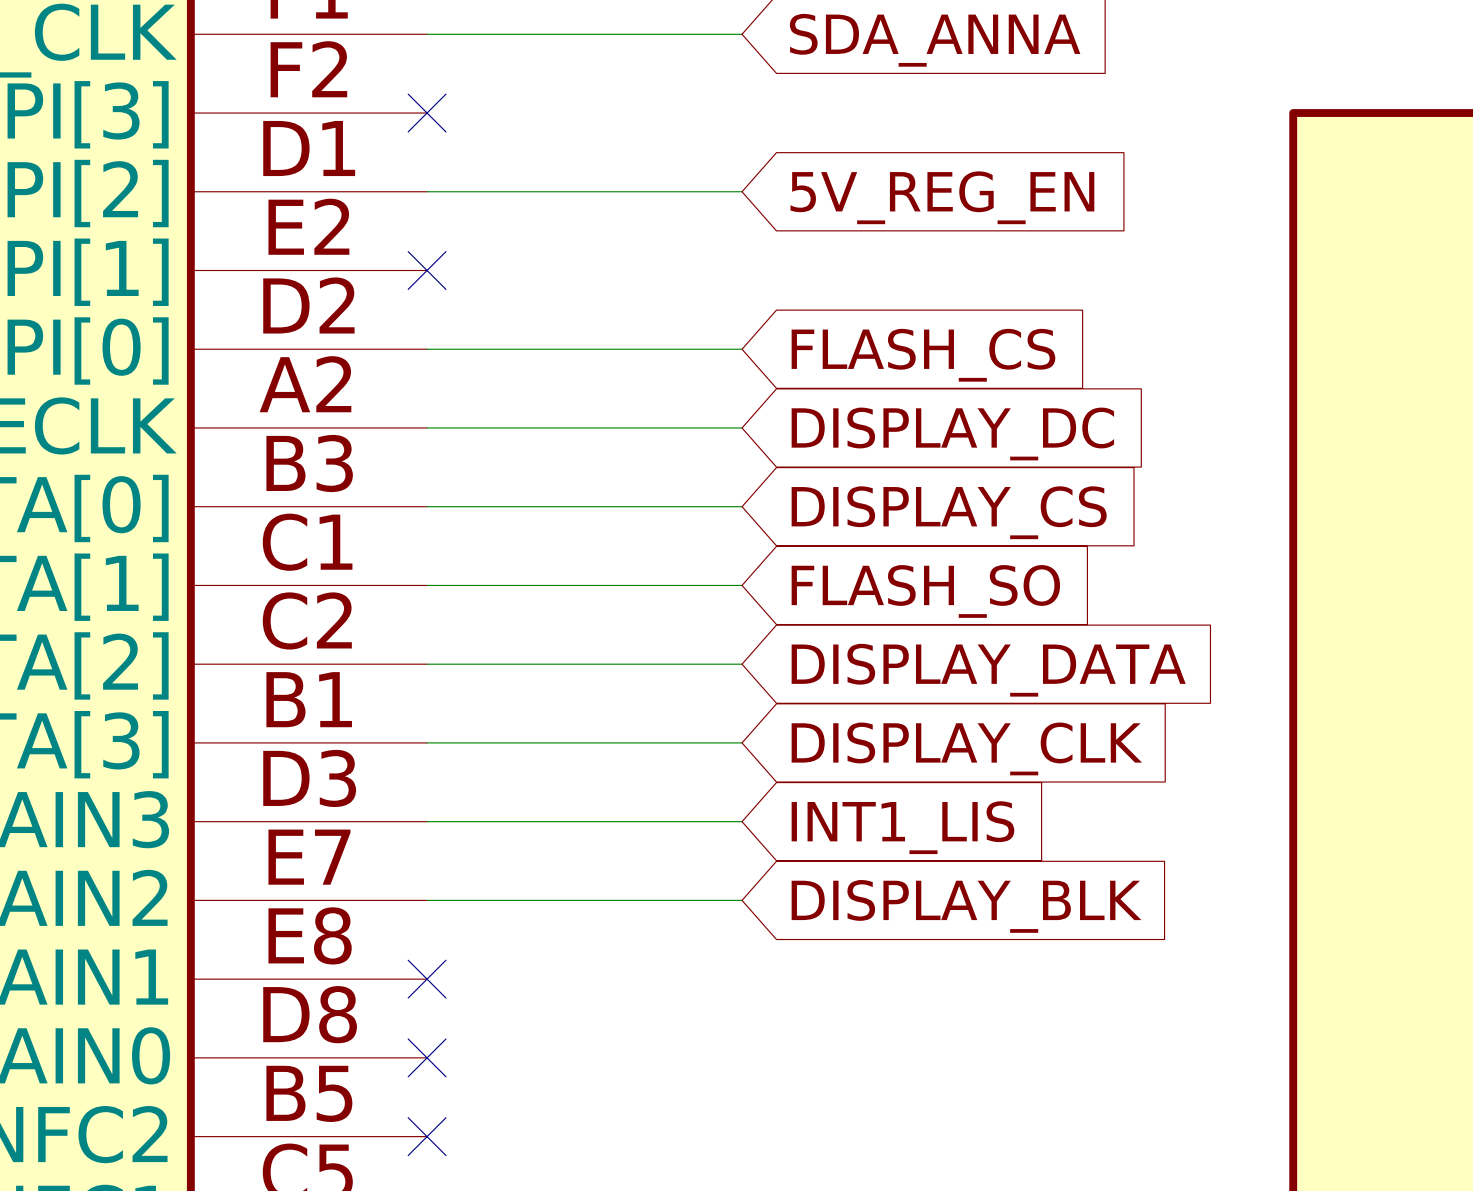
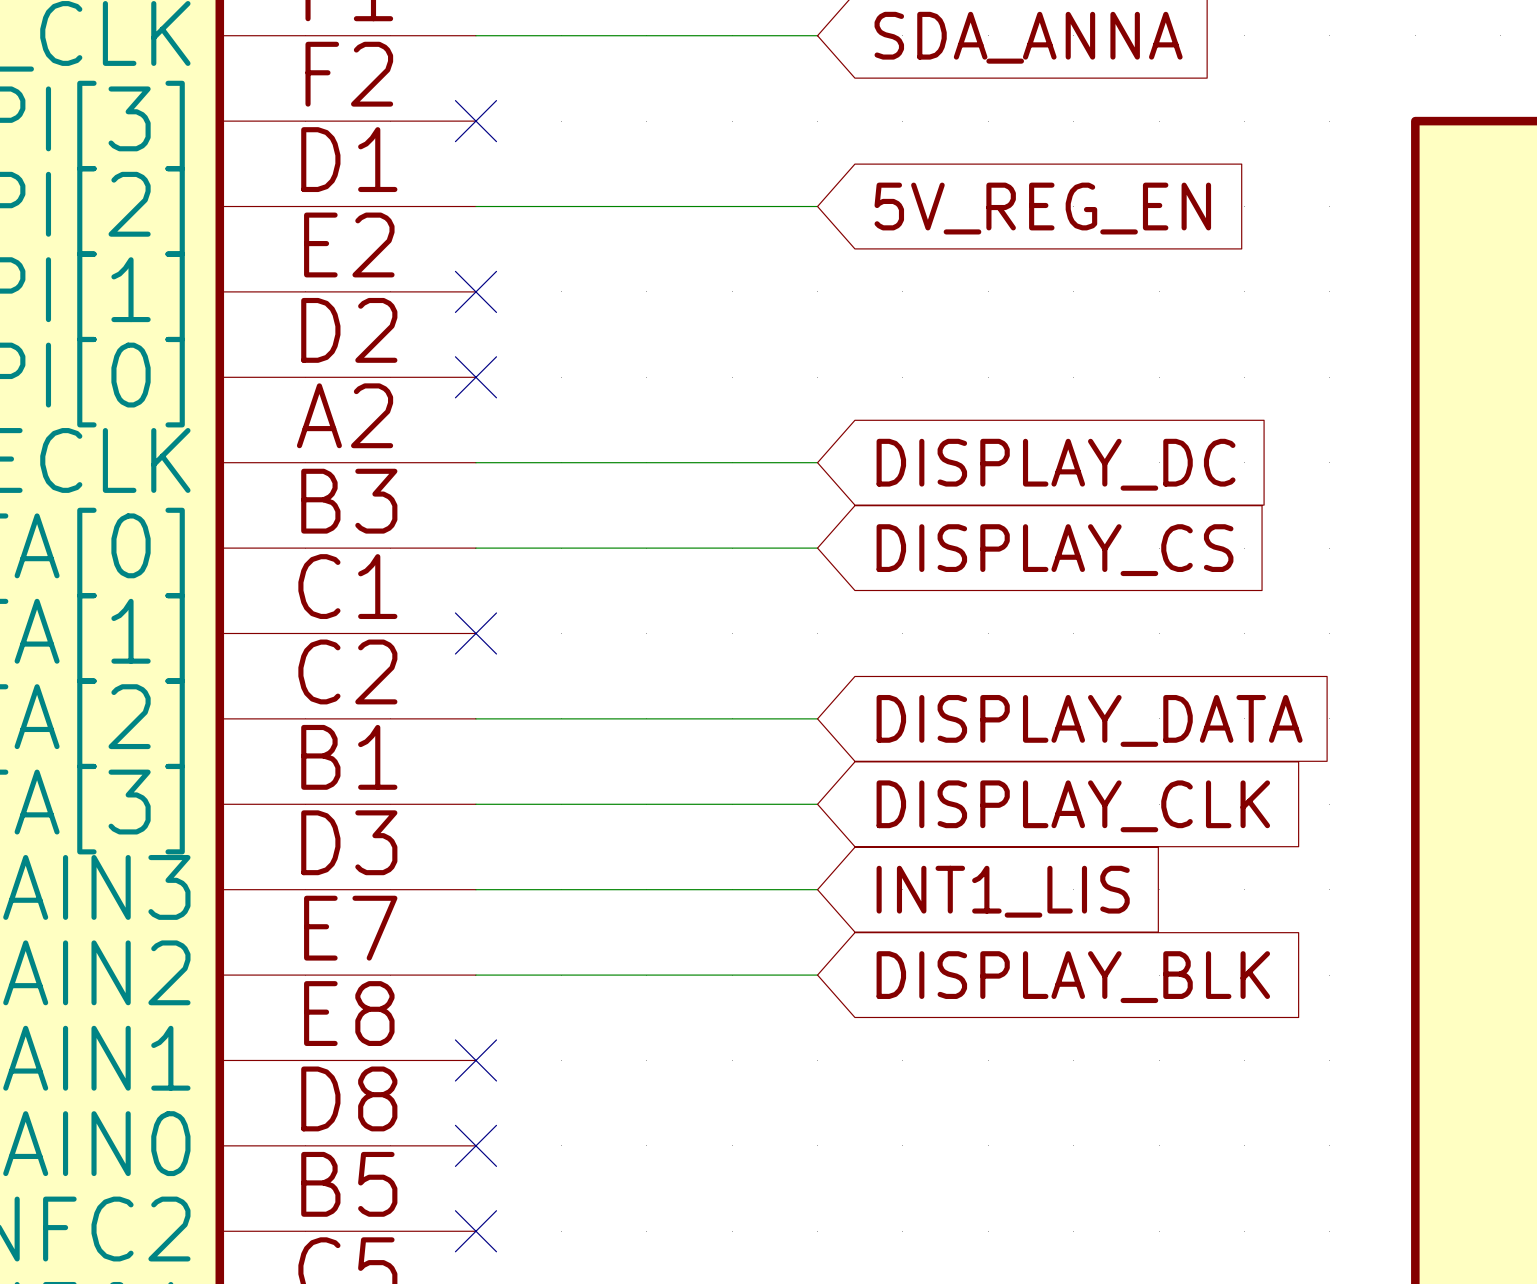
wire: (427, 349) (742, 349) -> none
no-connect mark: none -> (475, 377)
global label: FLASH_CS (923, 355) -> none
wire: (427, 585) (742, 585) -> none
no-connect mark: none -> (475, 633)
global label: FLASH_SO (925, 591) -> none

